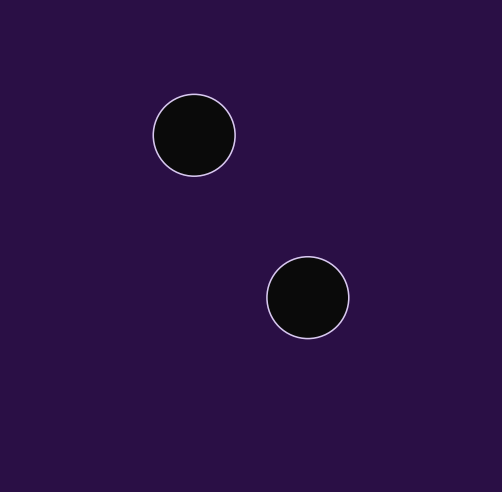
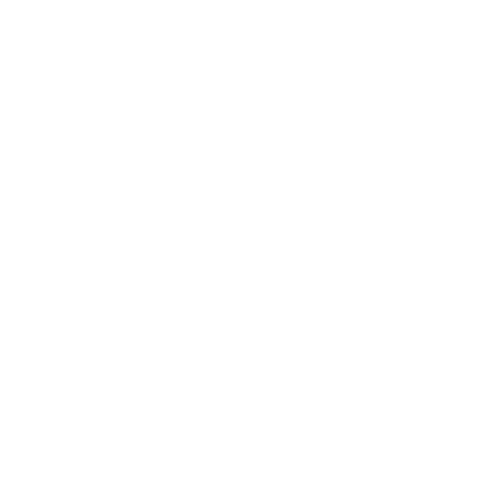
part: (194, 135) -> none
part: (307, 297) -> none

